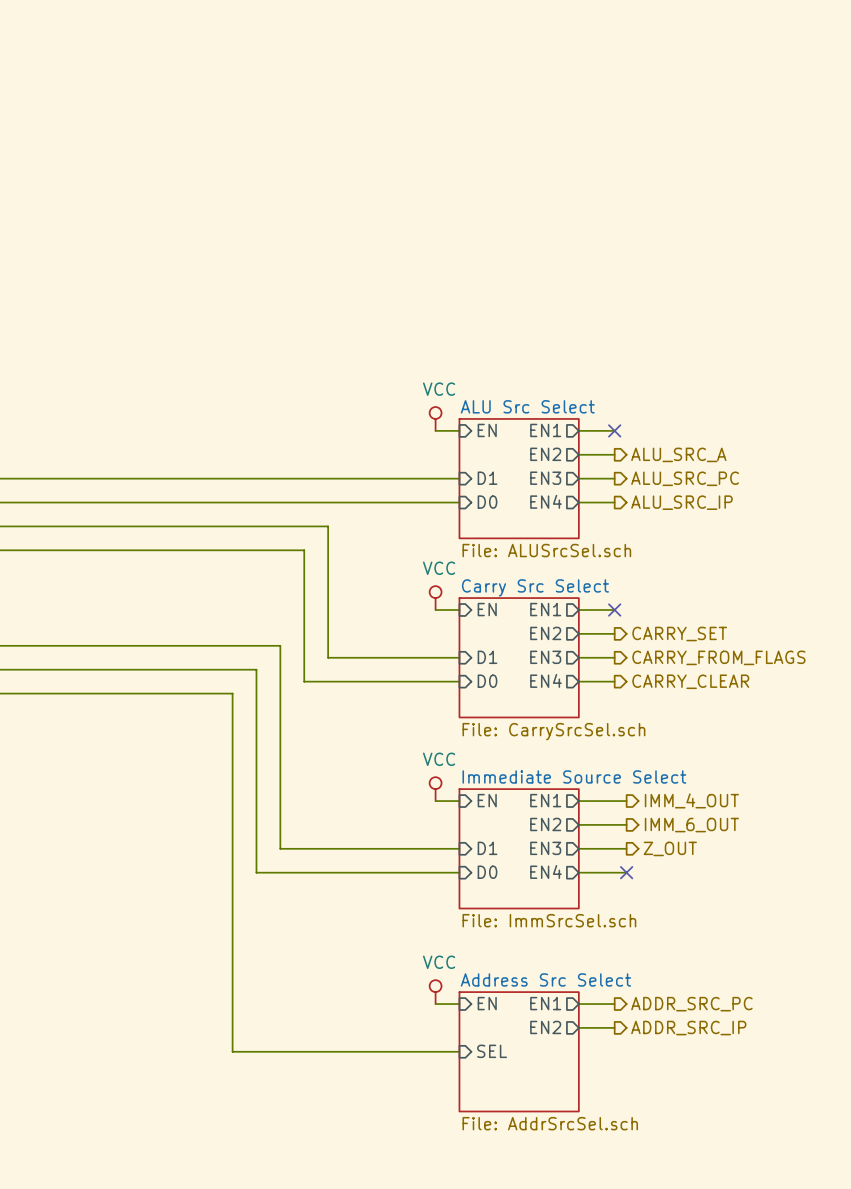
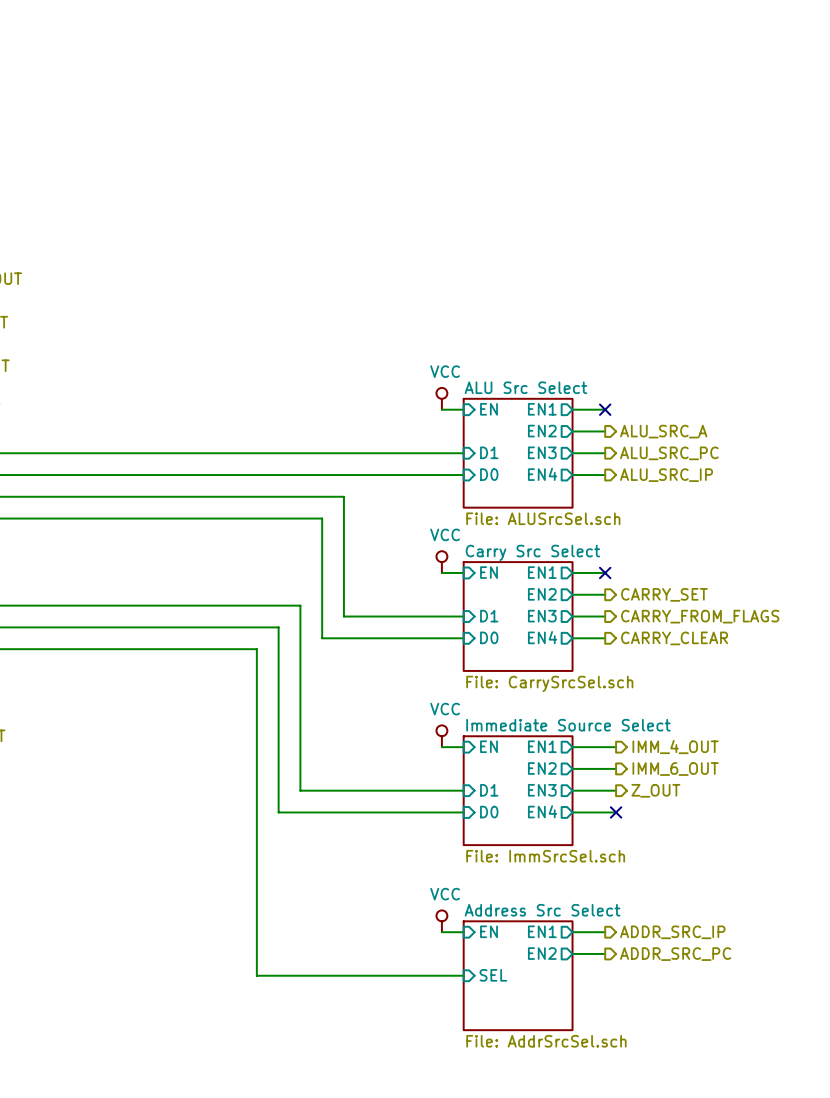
hierarchical label: ADDR_SRC_PC (691, 1004) -> ADDR_SRC_IP (672, 932)
hierarchical label: ADDR_SRC_IP (688, 1028) -> ADDR_SRC_PC (675, 954)

